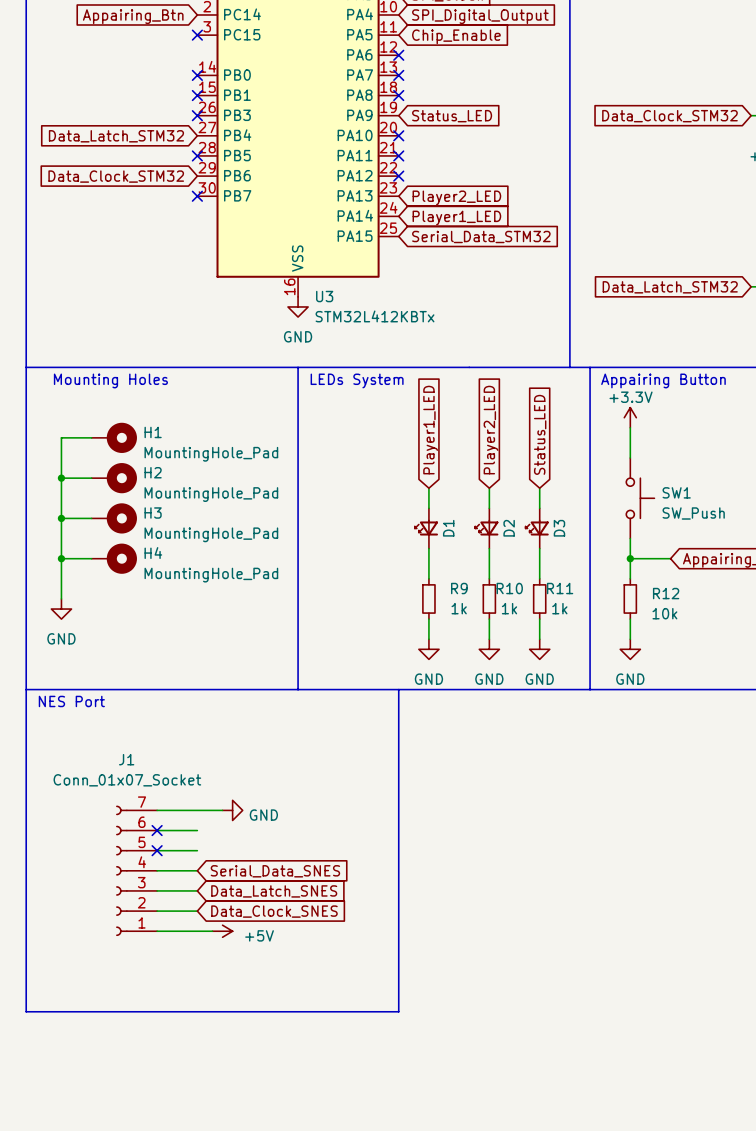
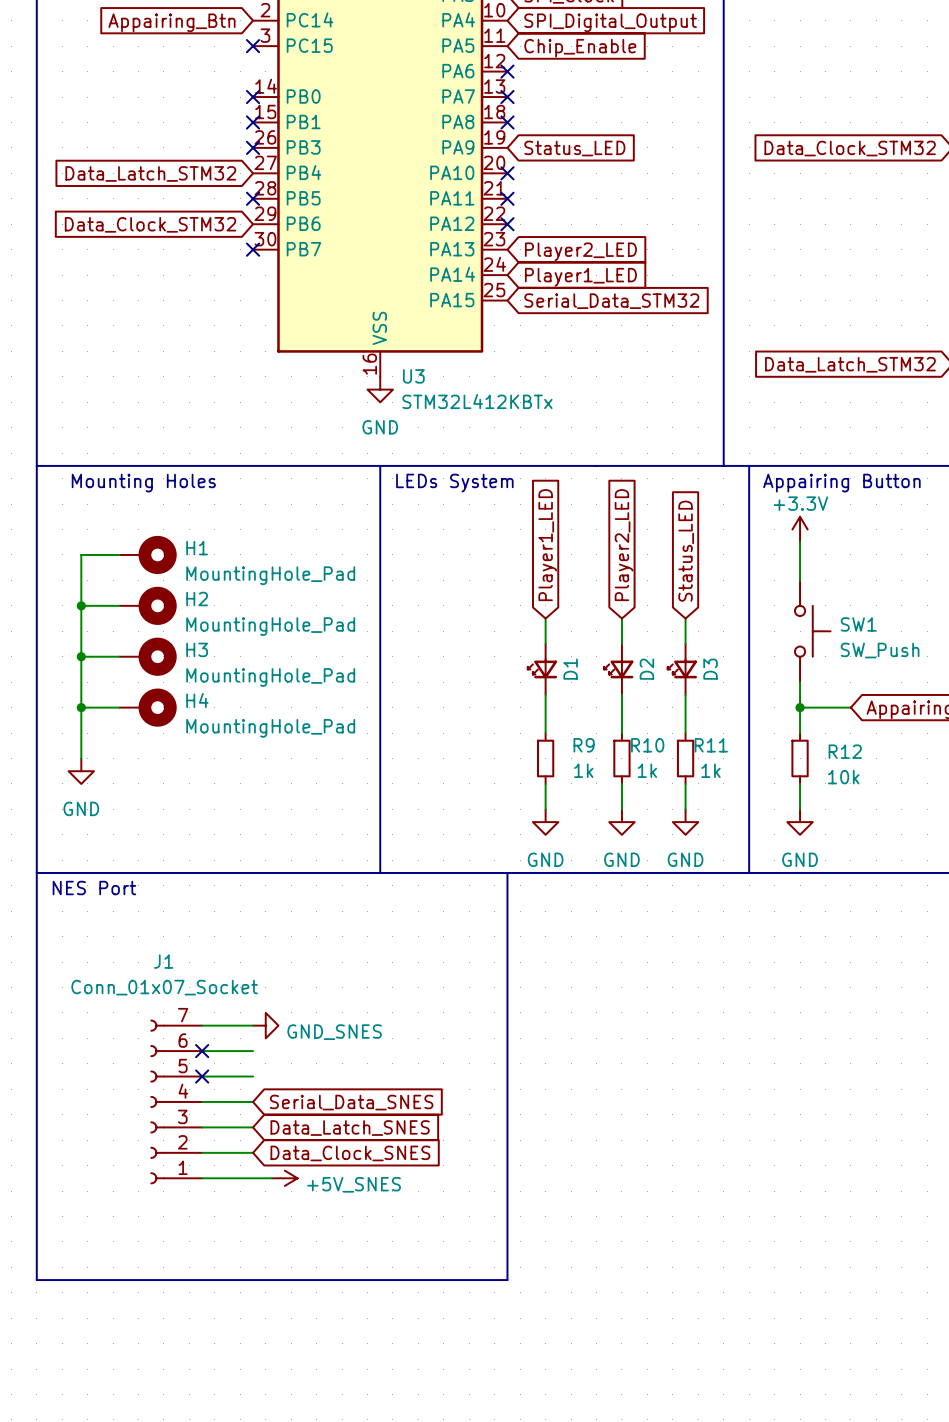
power symbol: none -> GND_SNES (265, 1025)
power symbol: GND (232, 810) -> none
power symbol: +5V (222, 931) -> +5V_SNES (284, 1178)

